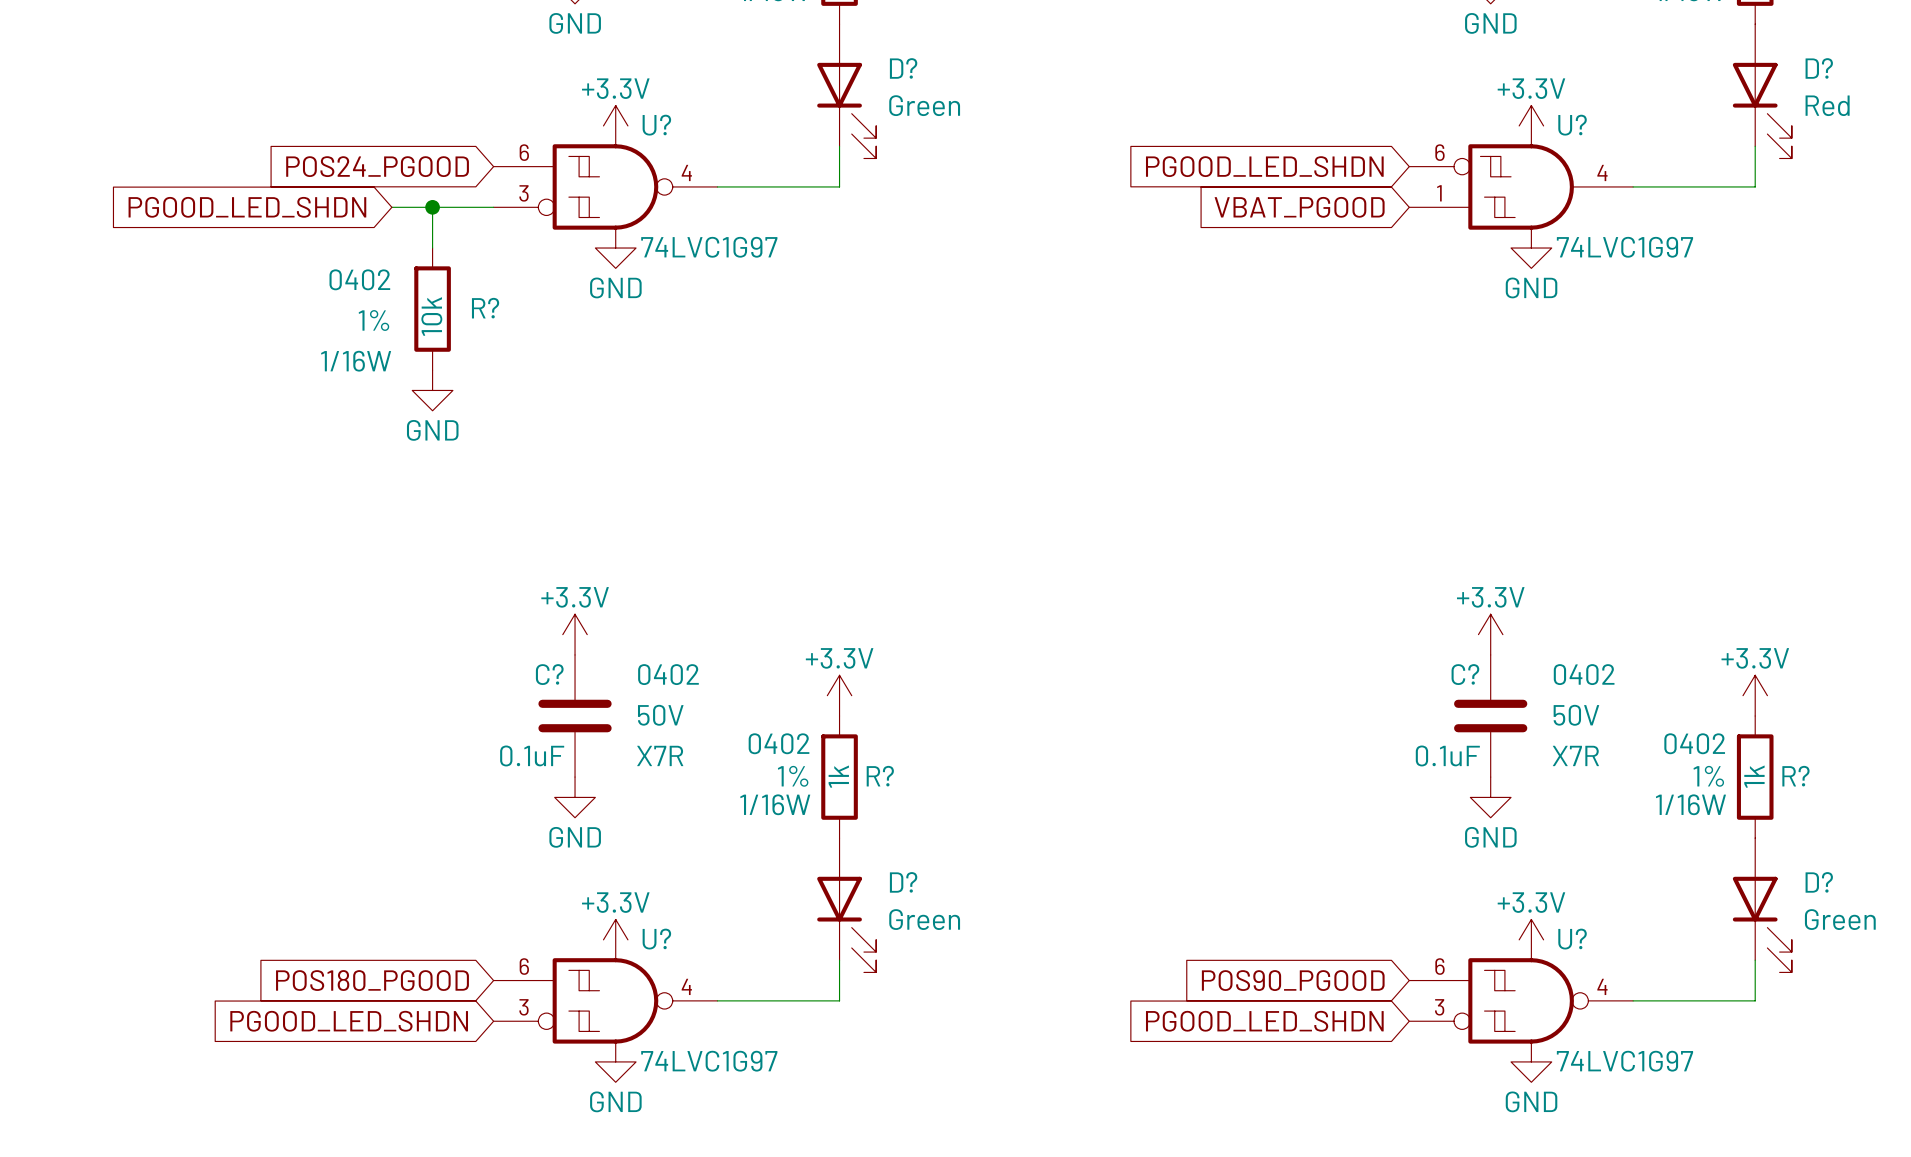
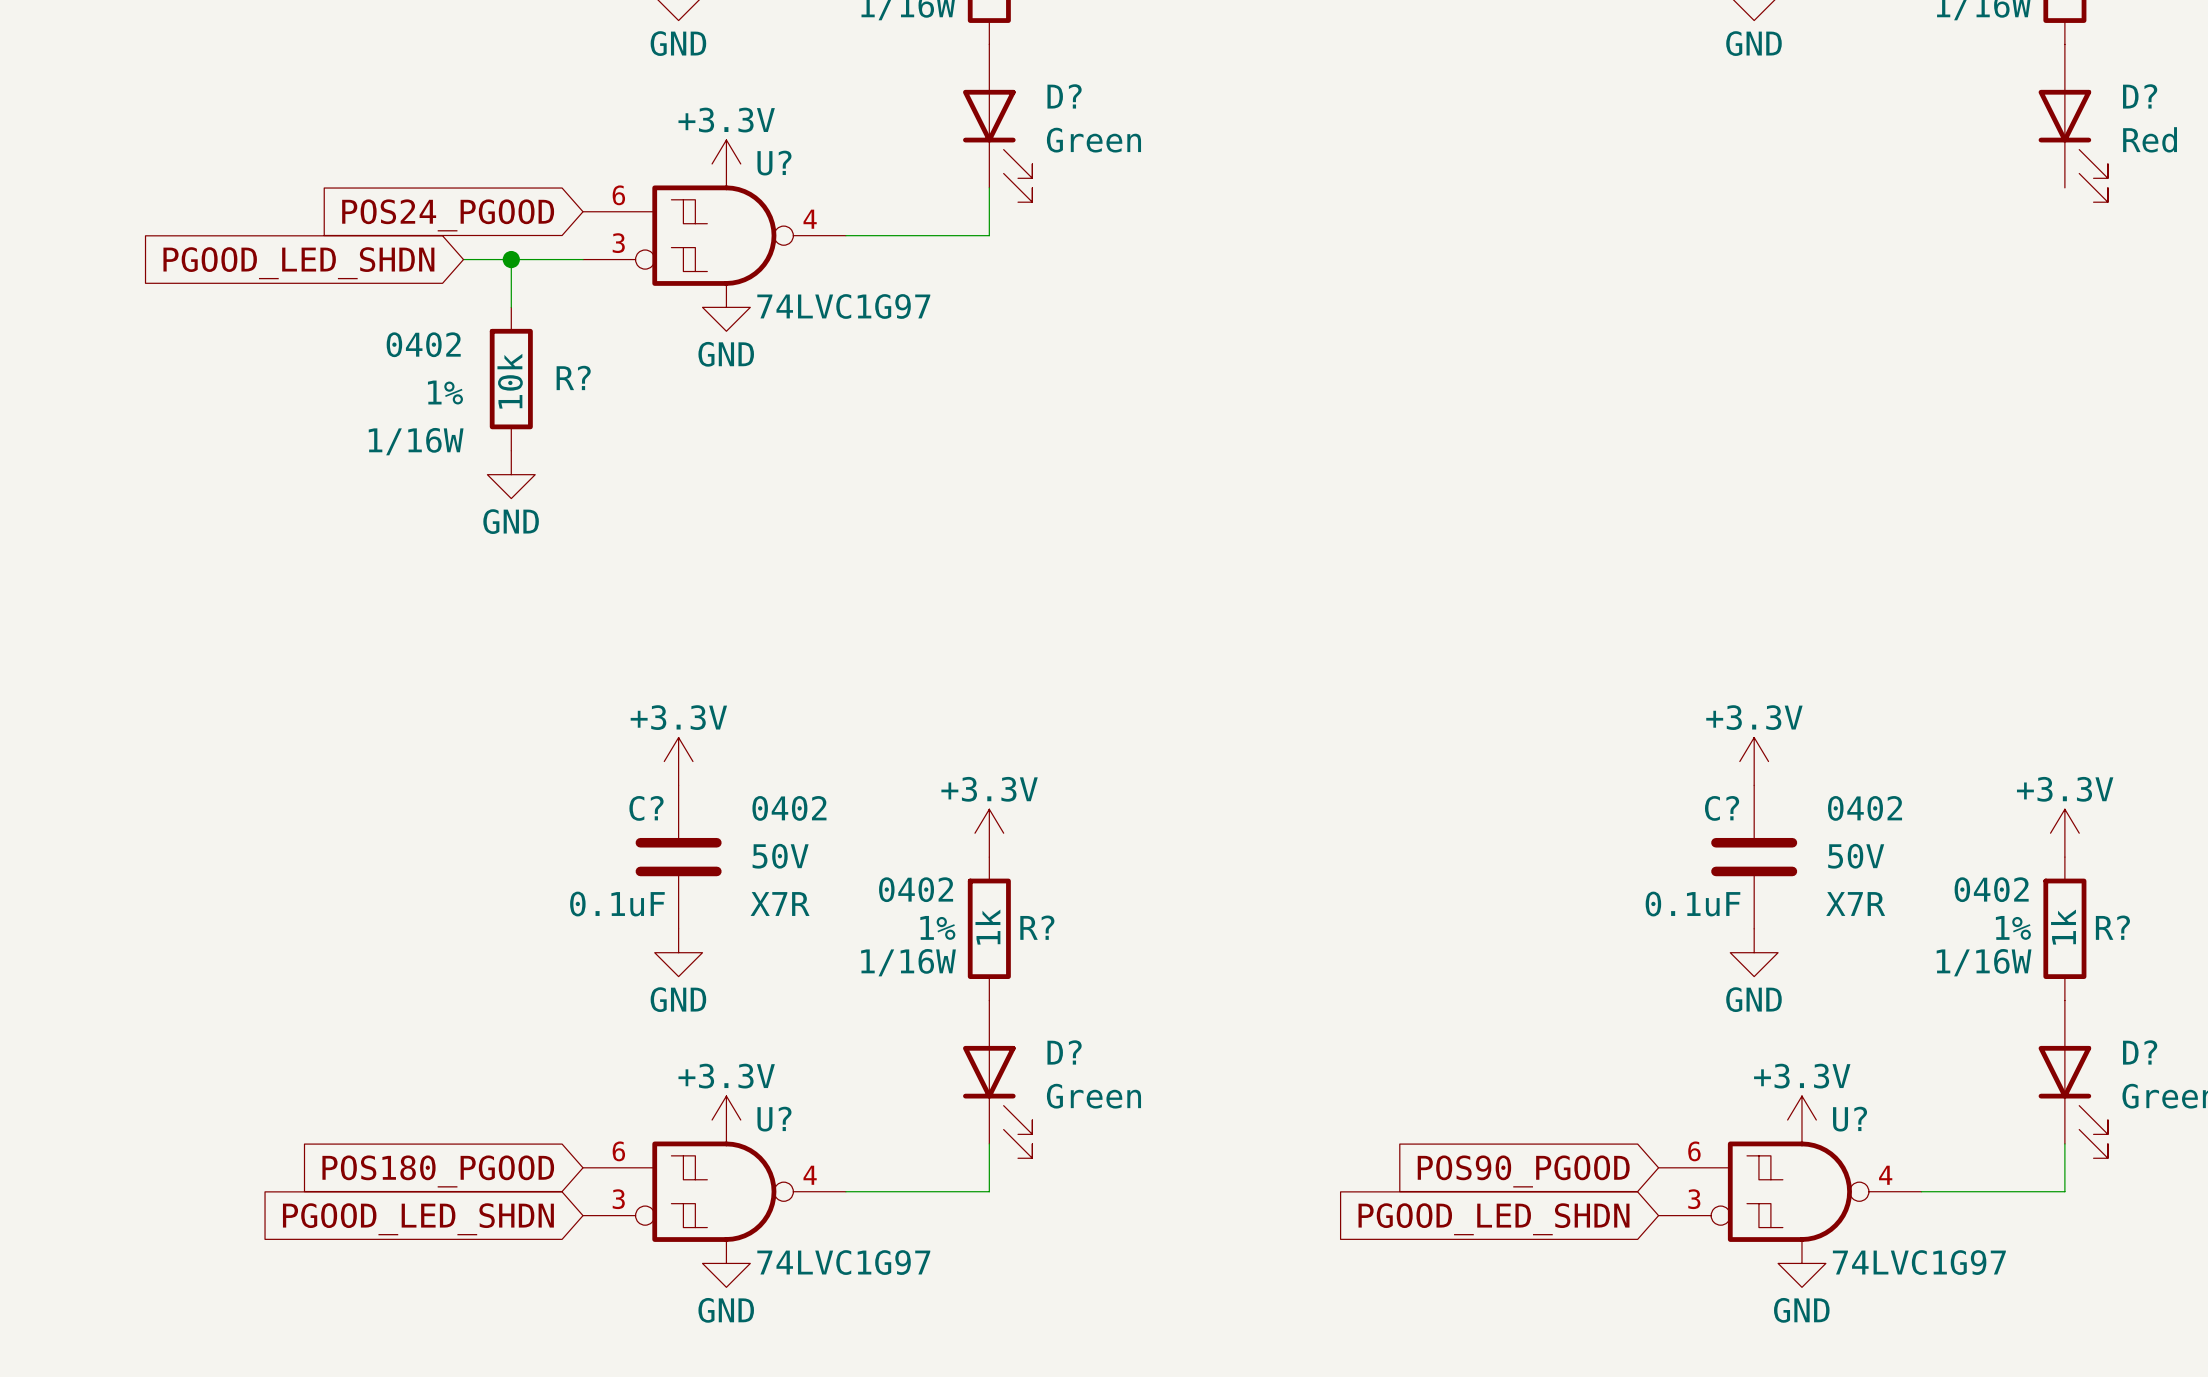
power symbol: +3.3V (1531, 125) -> none
wire: (1755, 146) (1755, 186) (1633, 186) -> none
global label: PGOOD_LED_SHDN (1264, 166) -> none
U?: 74LVC1G97 (1521, 186) -> none
global label: VBAT_PGOOD (1299, 207) -> none
power symbol: GND (1531, 248) -> none

